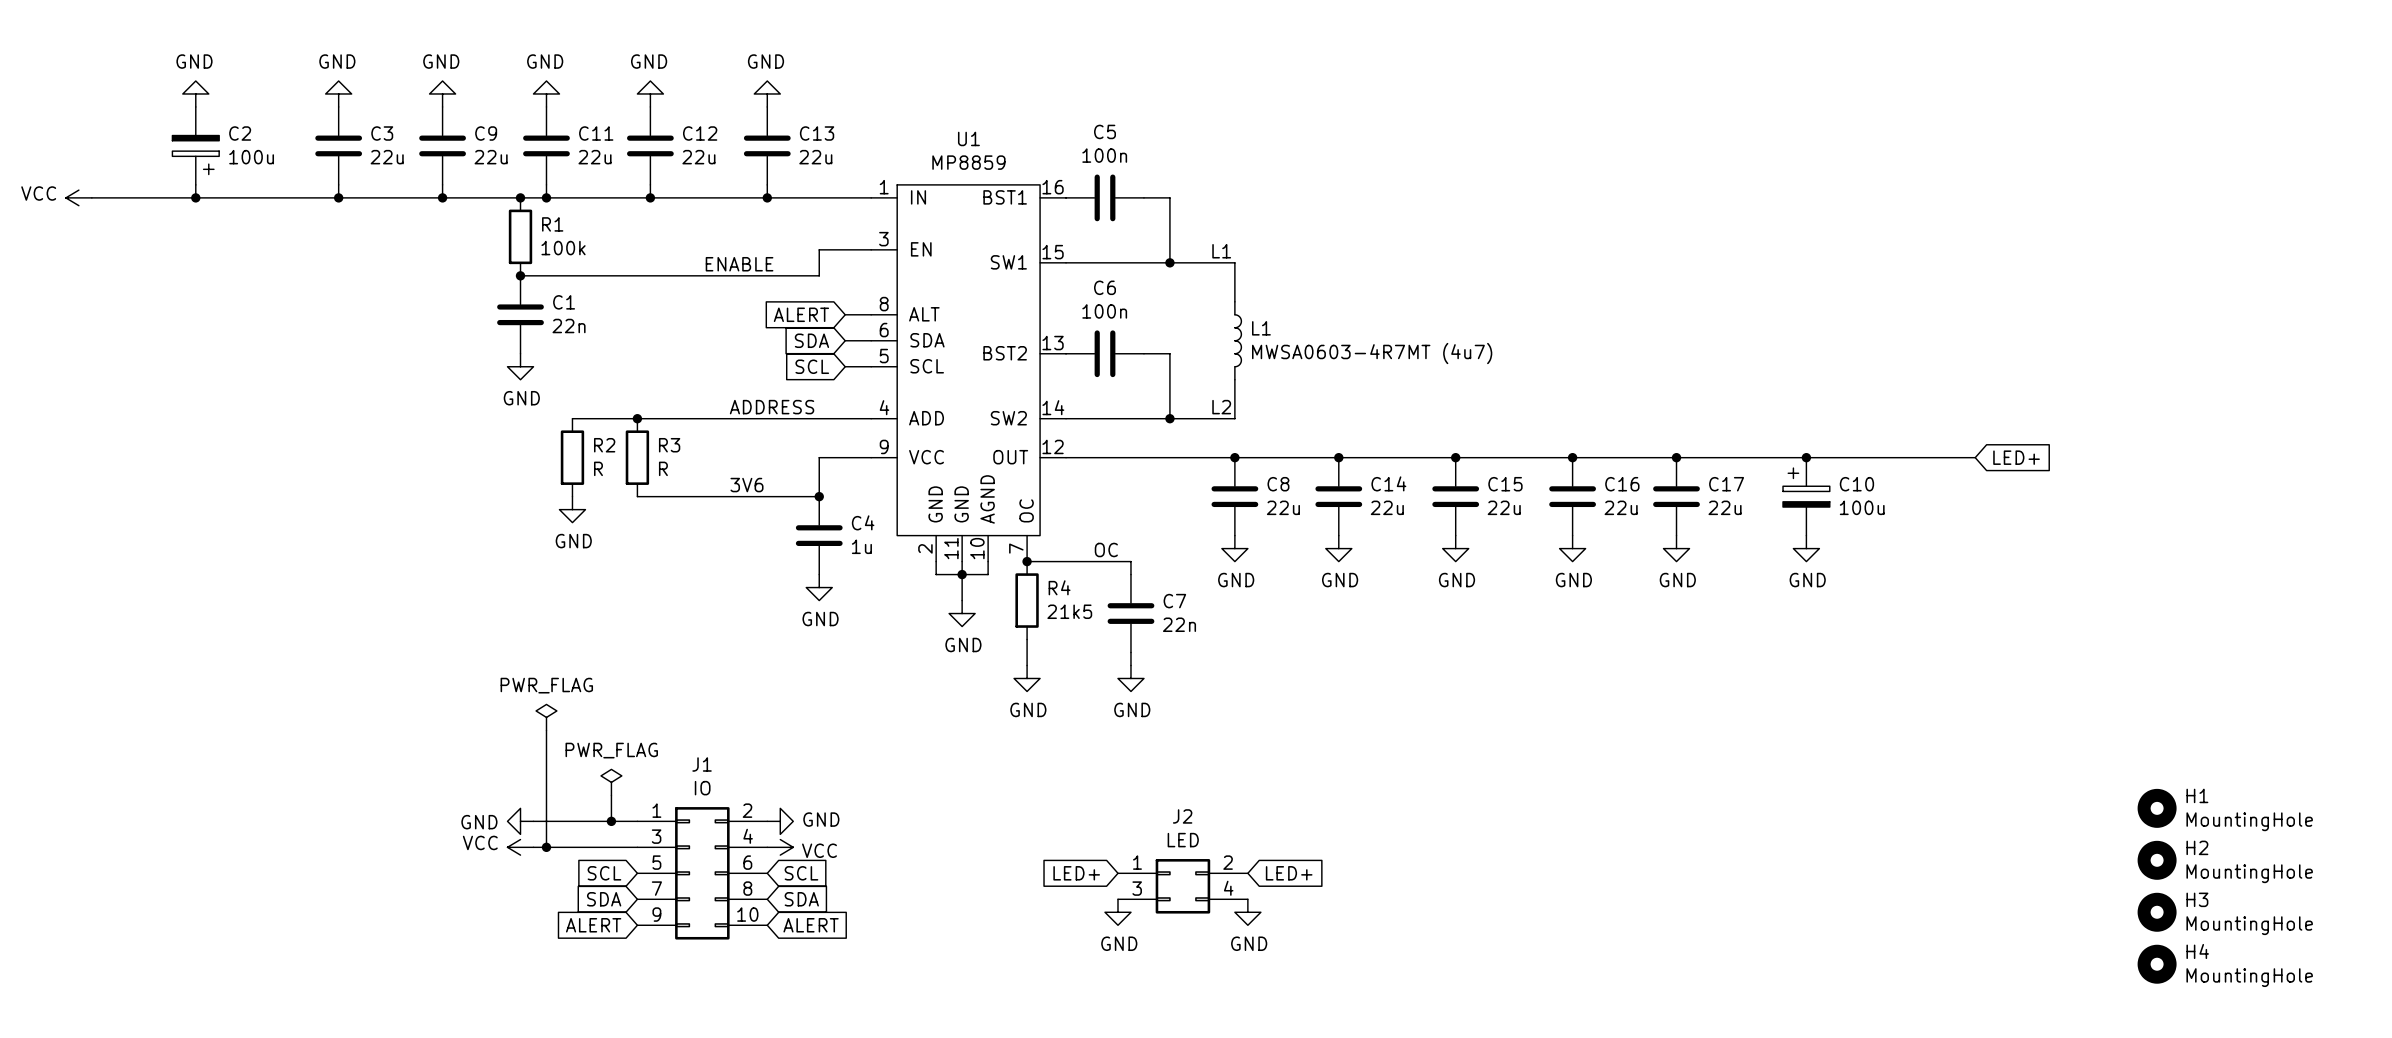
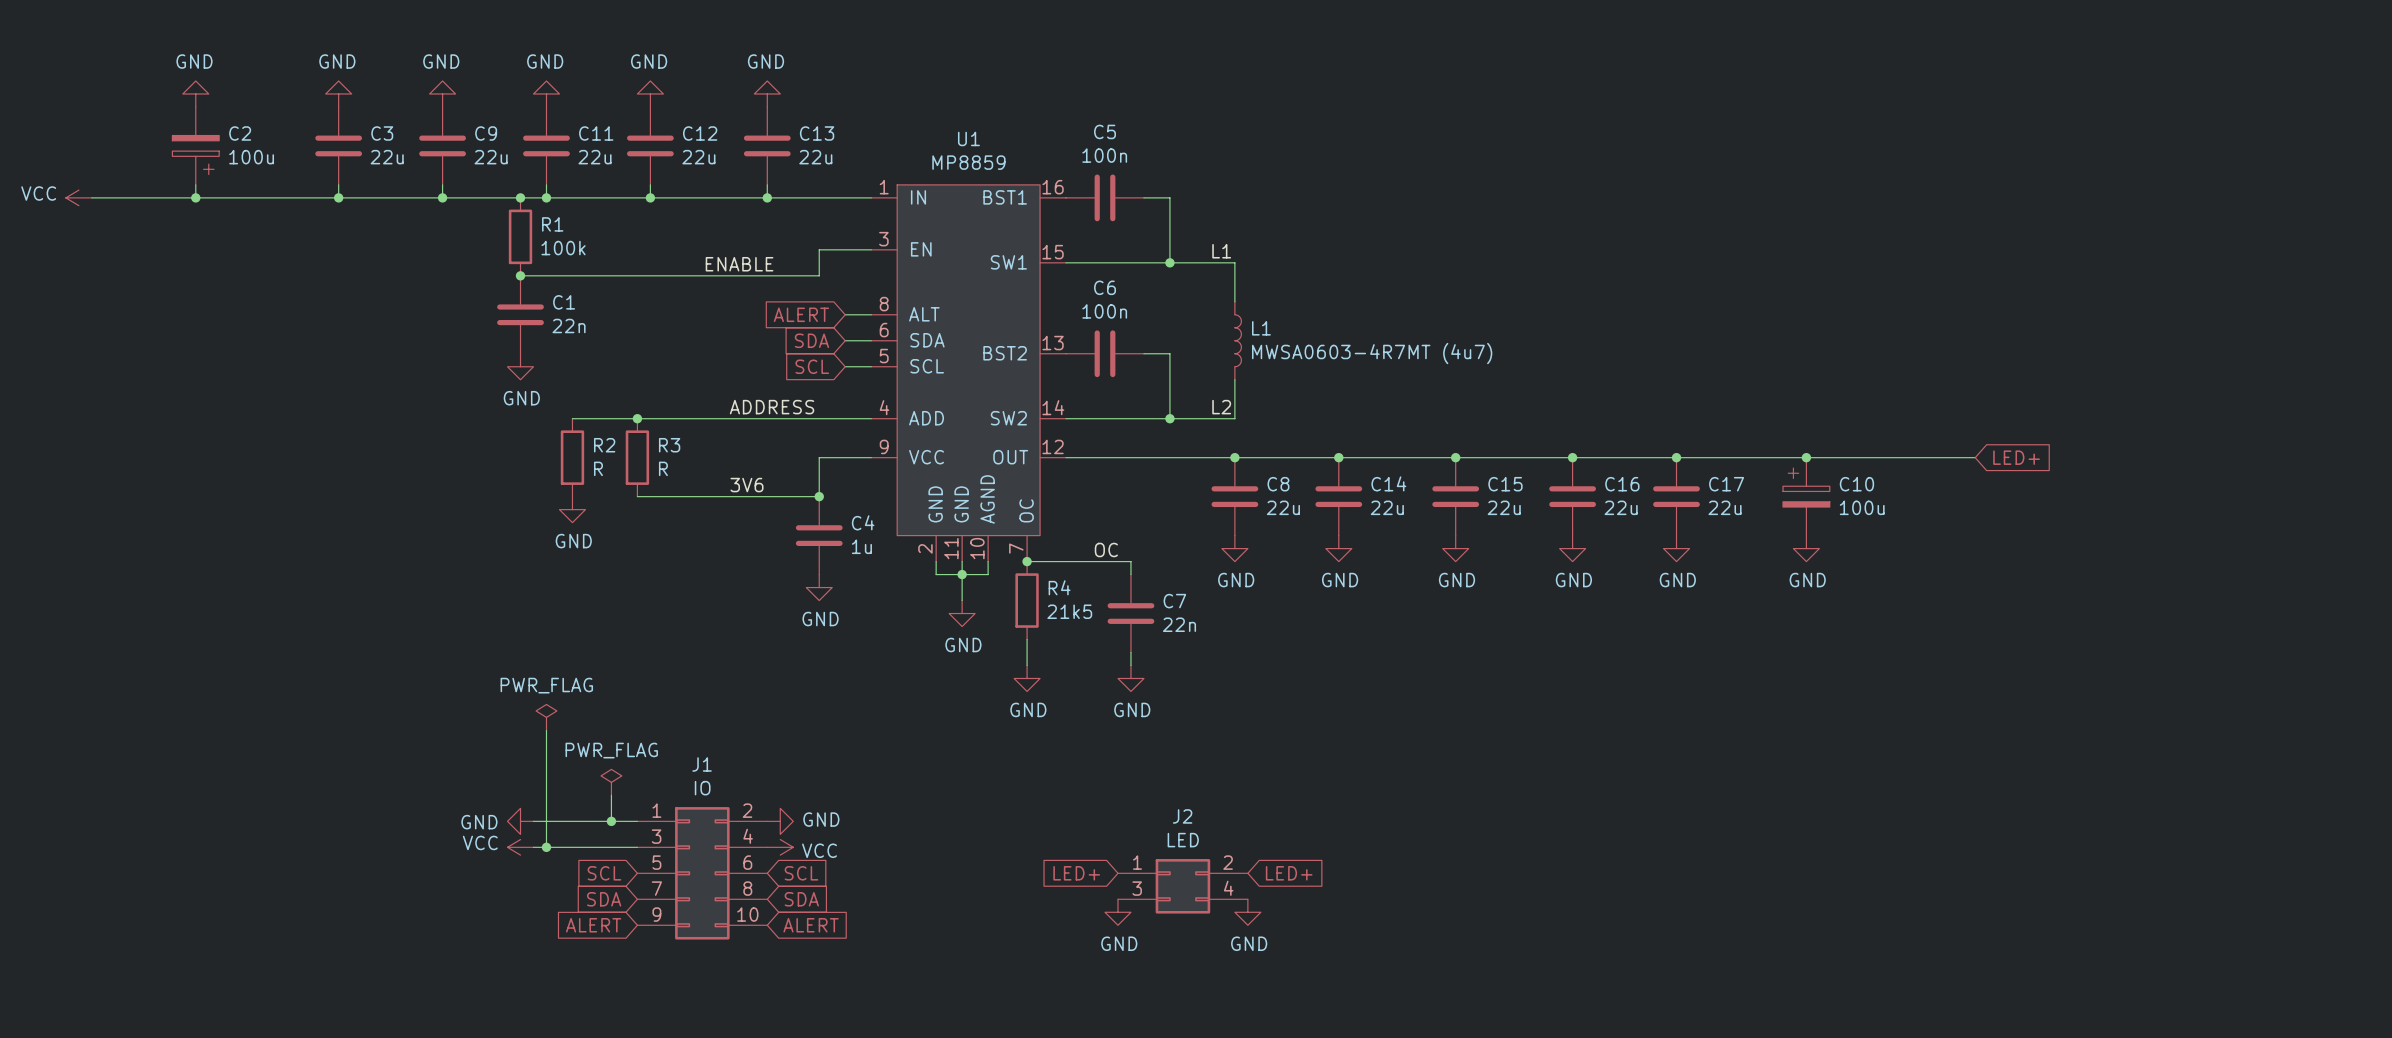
H1: MountingHole (2157, 808) -> none
H2: MountingHole (2157, 860) -> none
H3: MountingHole (2157, 912) -> none
H4: MountingHole (2157, 964) -> none

